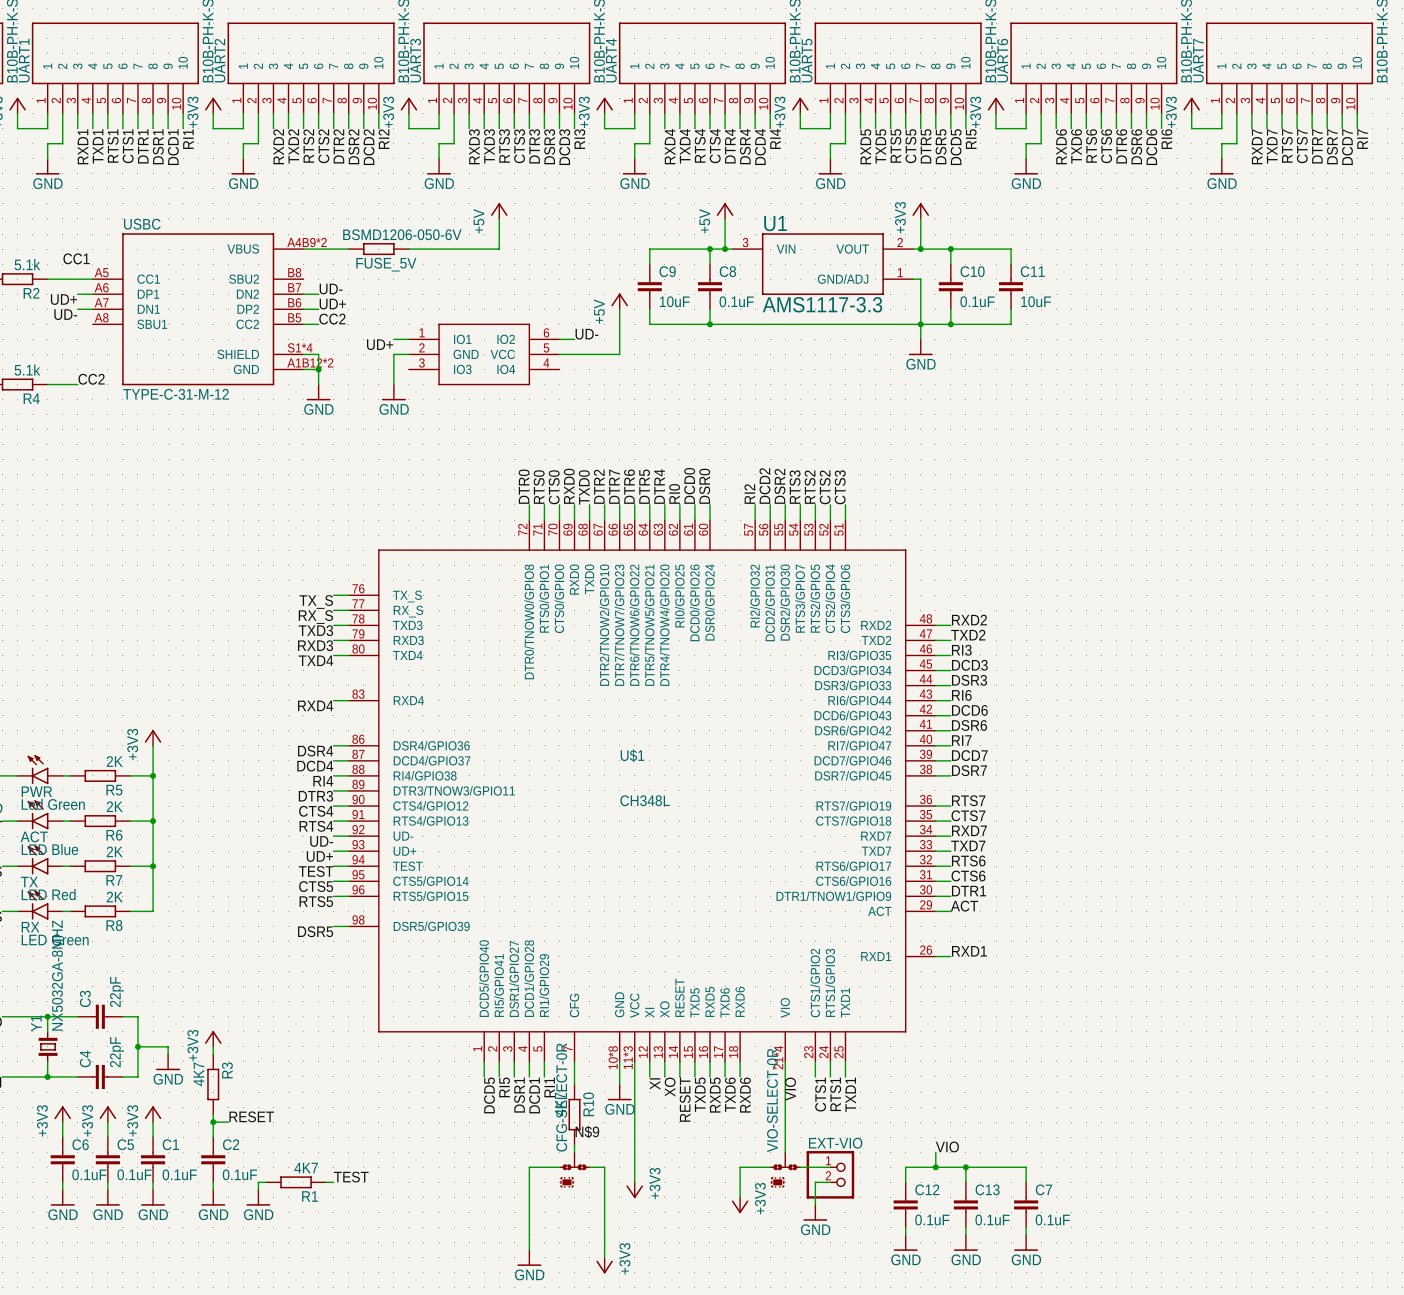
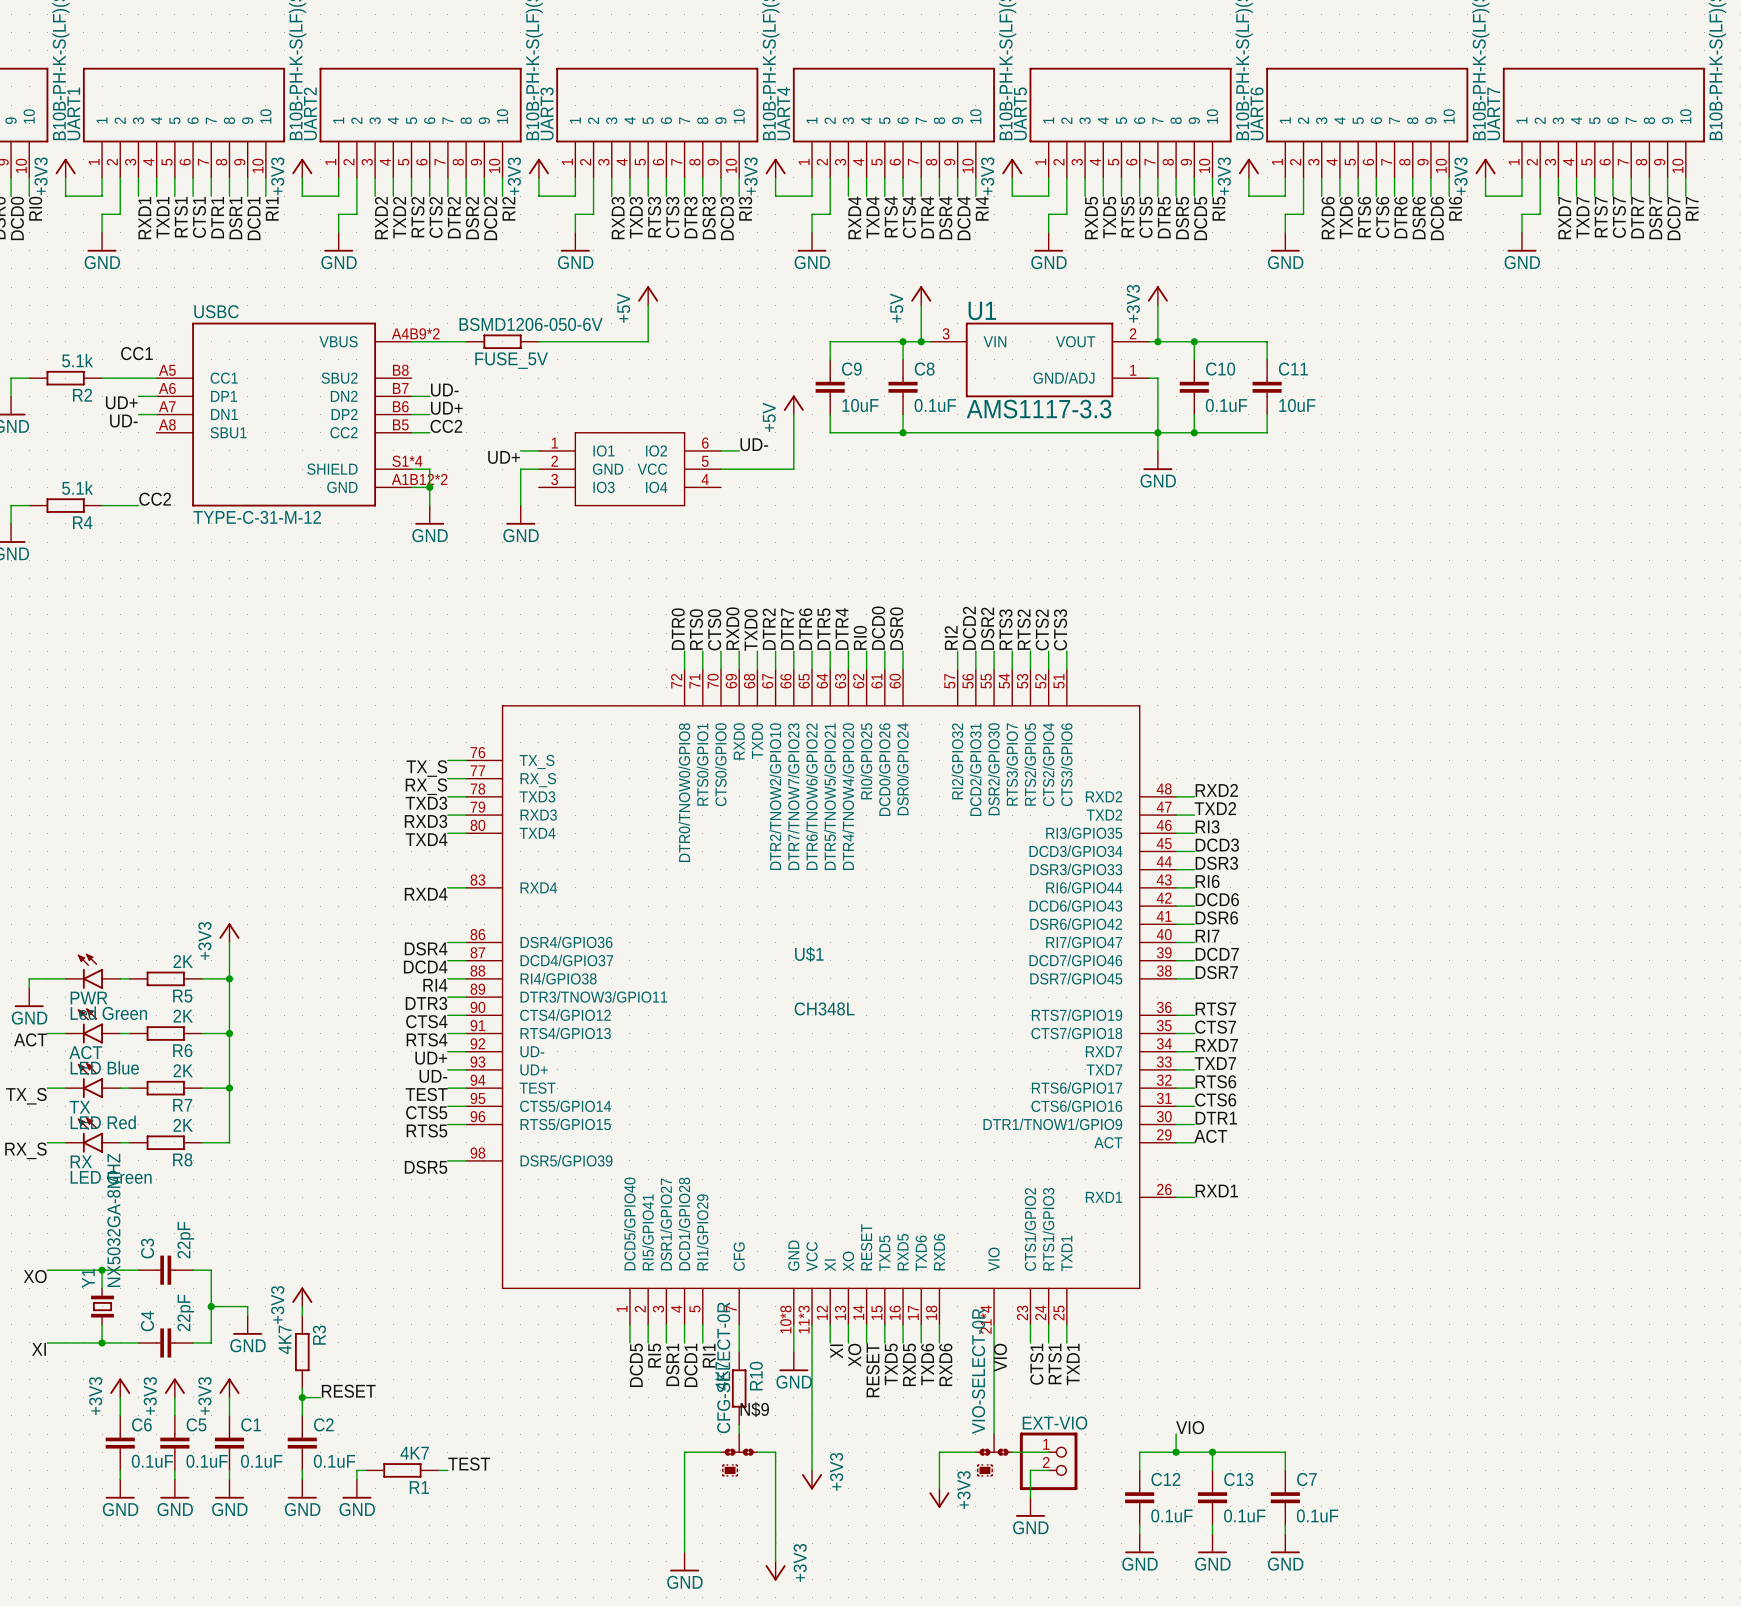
label: UD- (321, 841) -> UD+ (431, 1058)
label: UD+ (319, 856) -> UD- (433, 1076)

